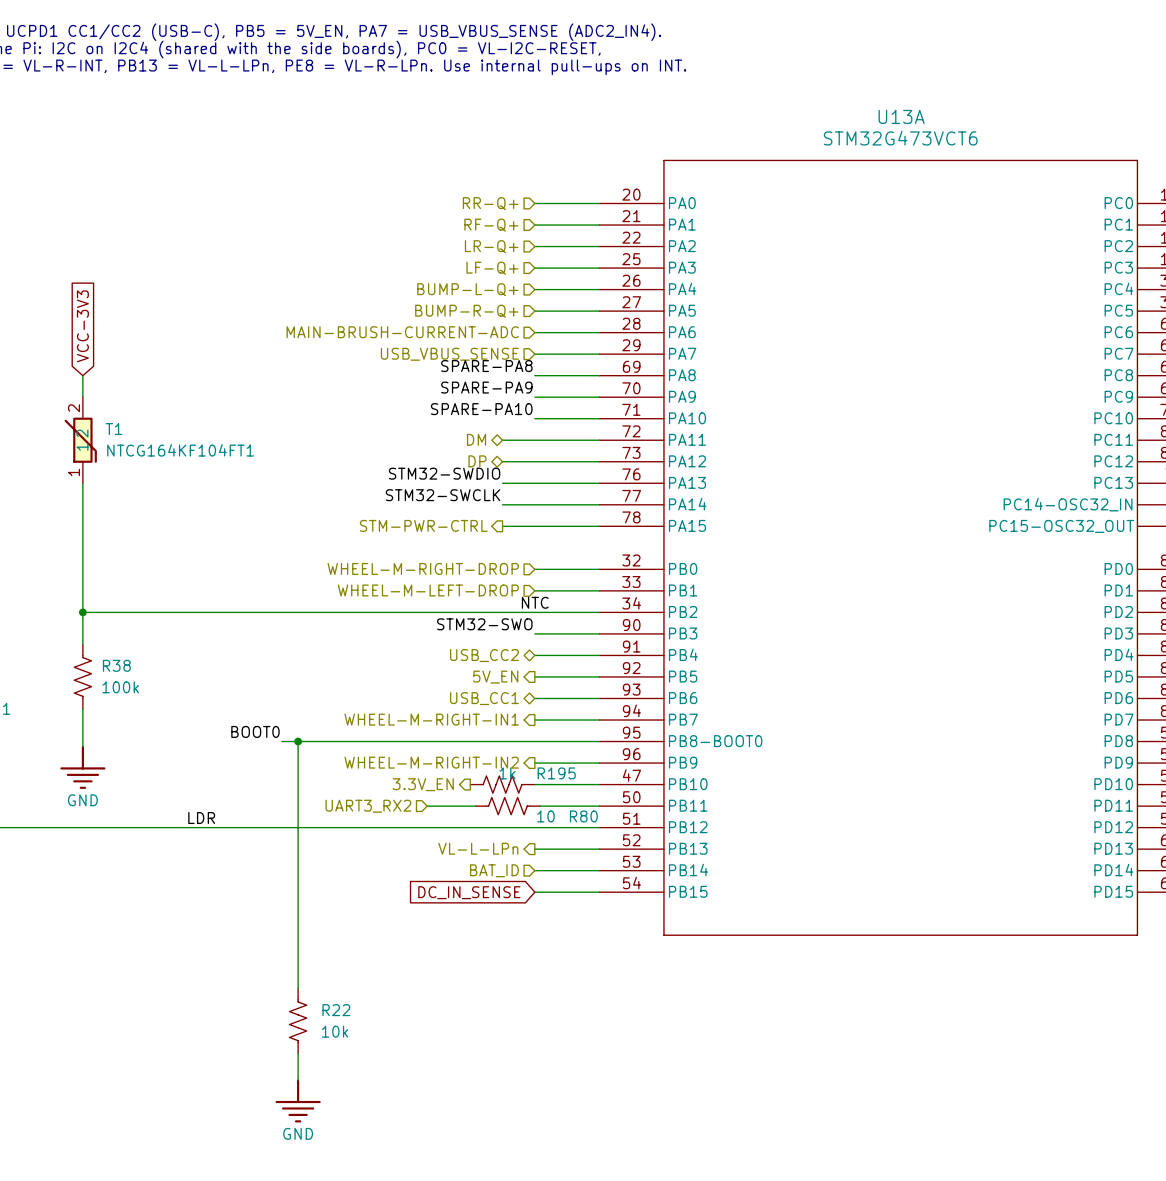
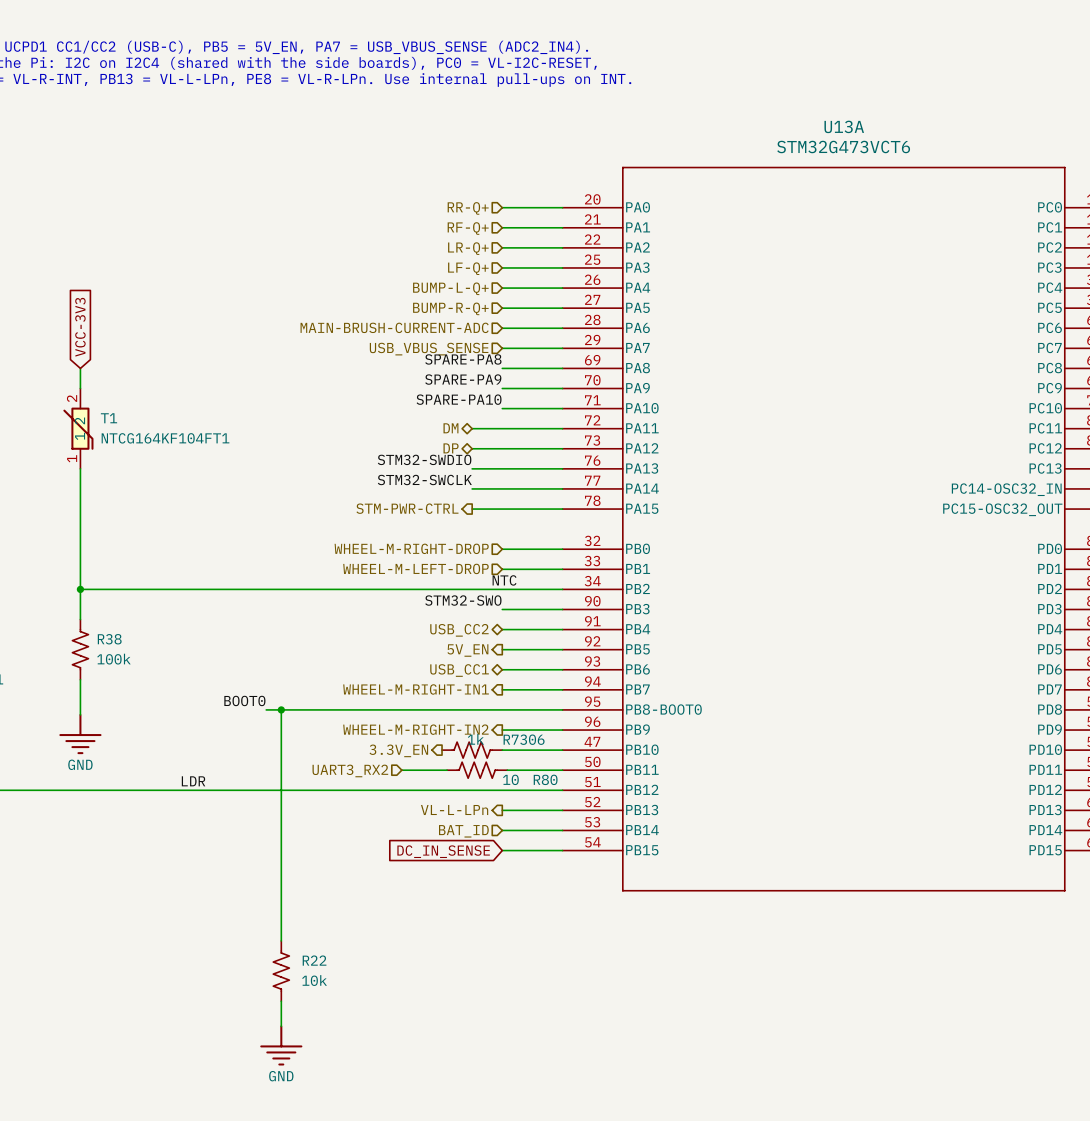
R195 name: R195 (556, 773) -> R7306 (524, 739)

